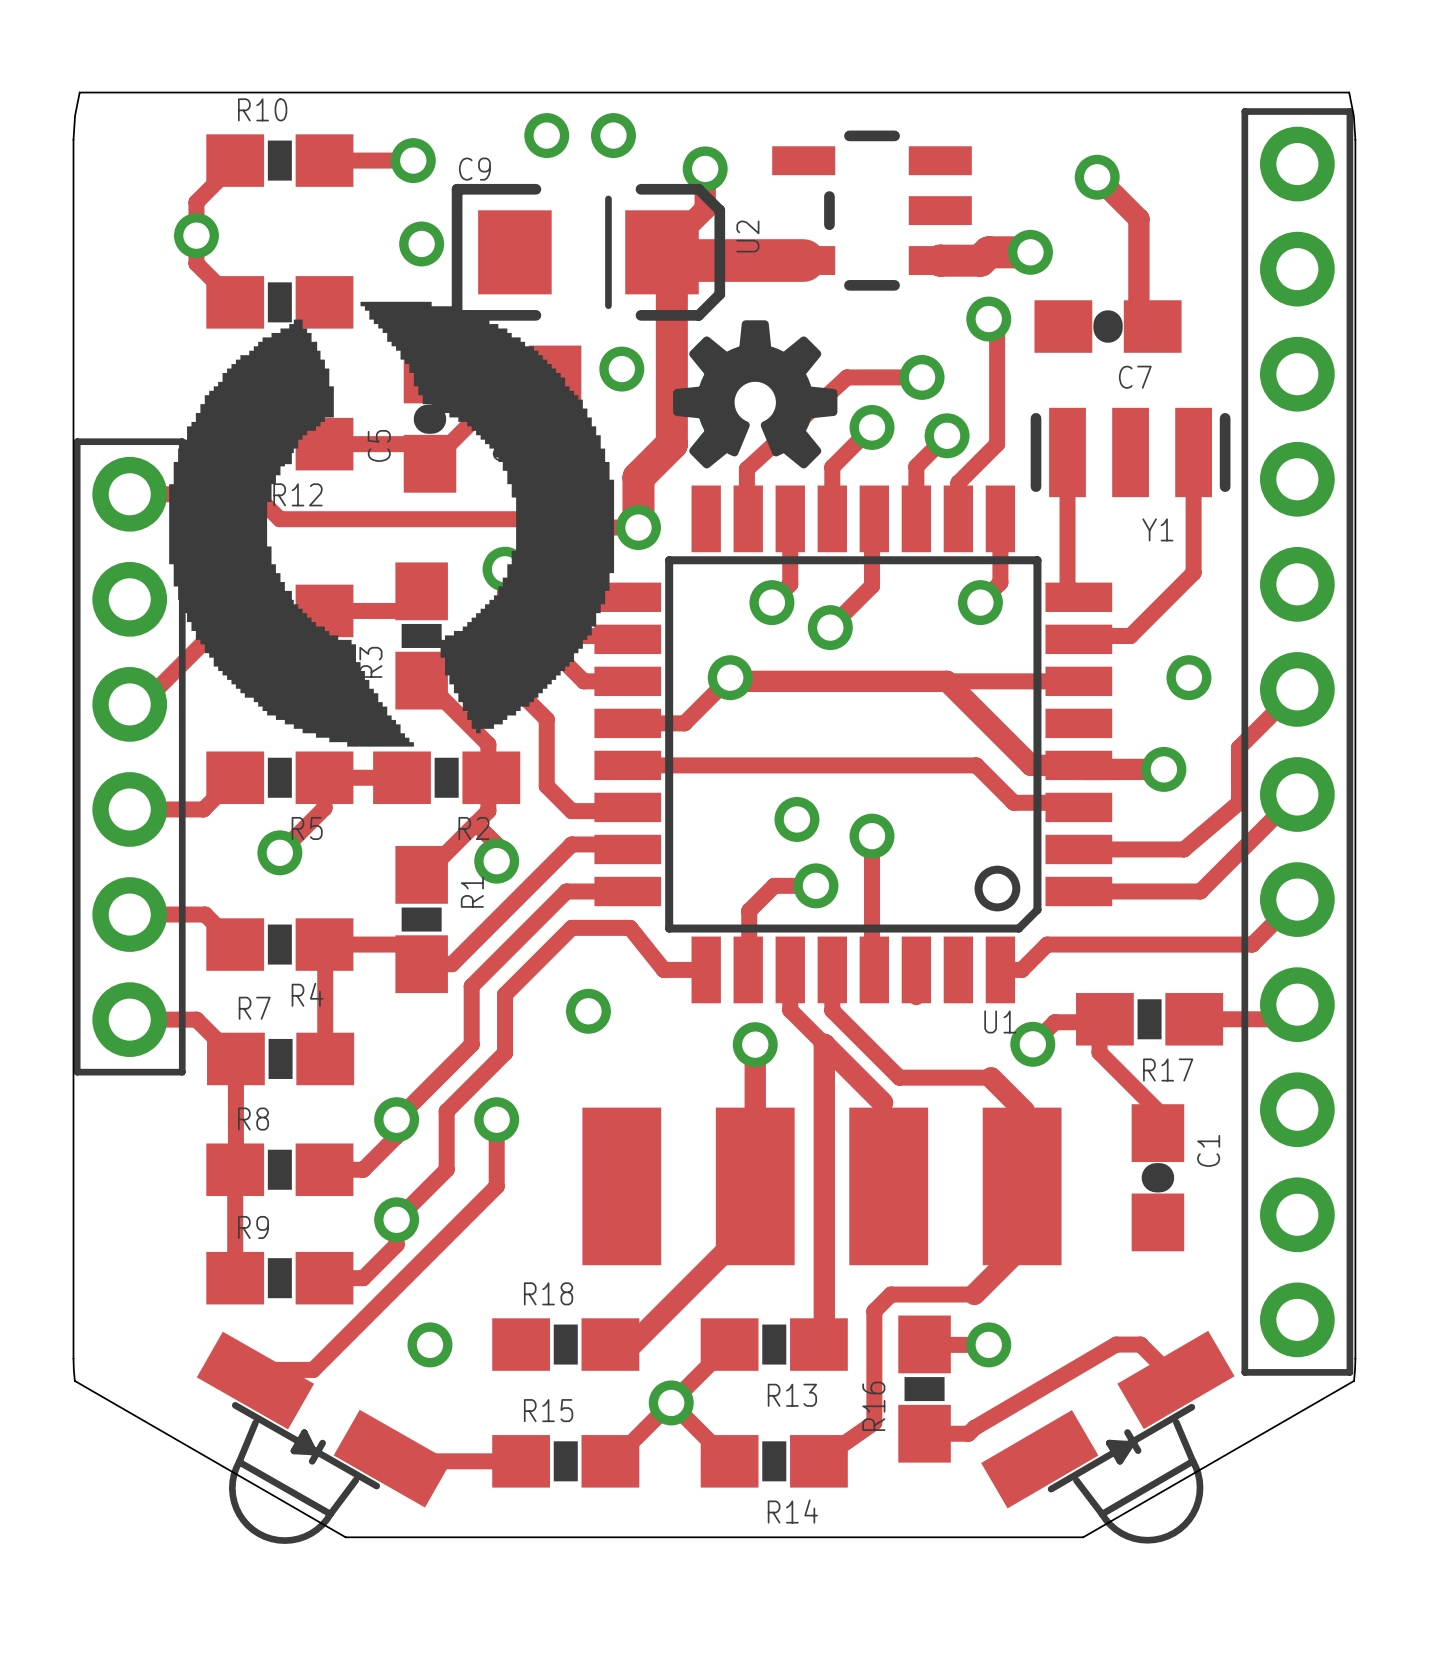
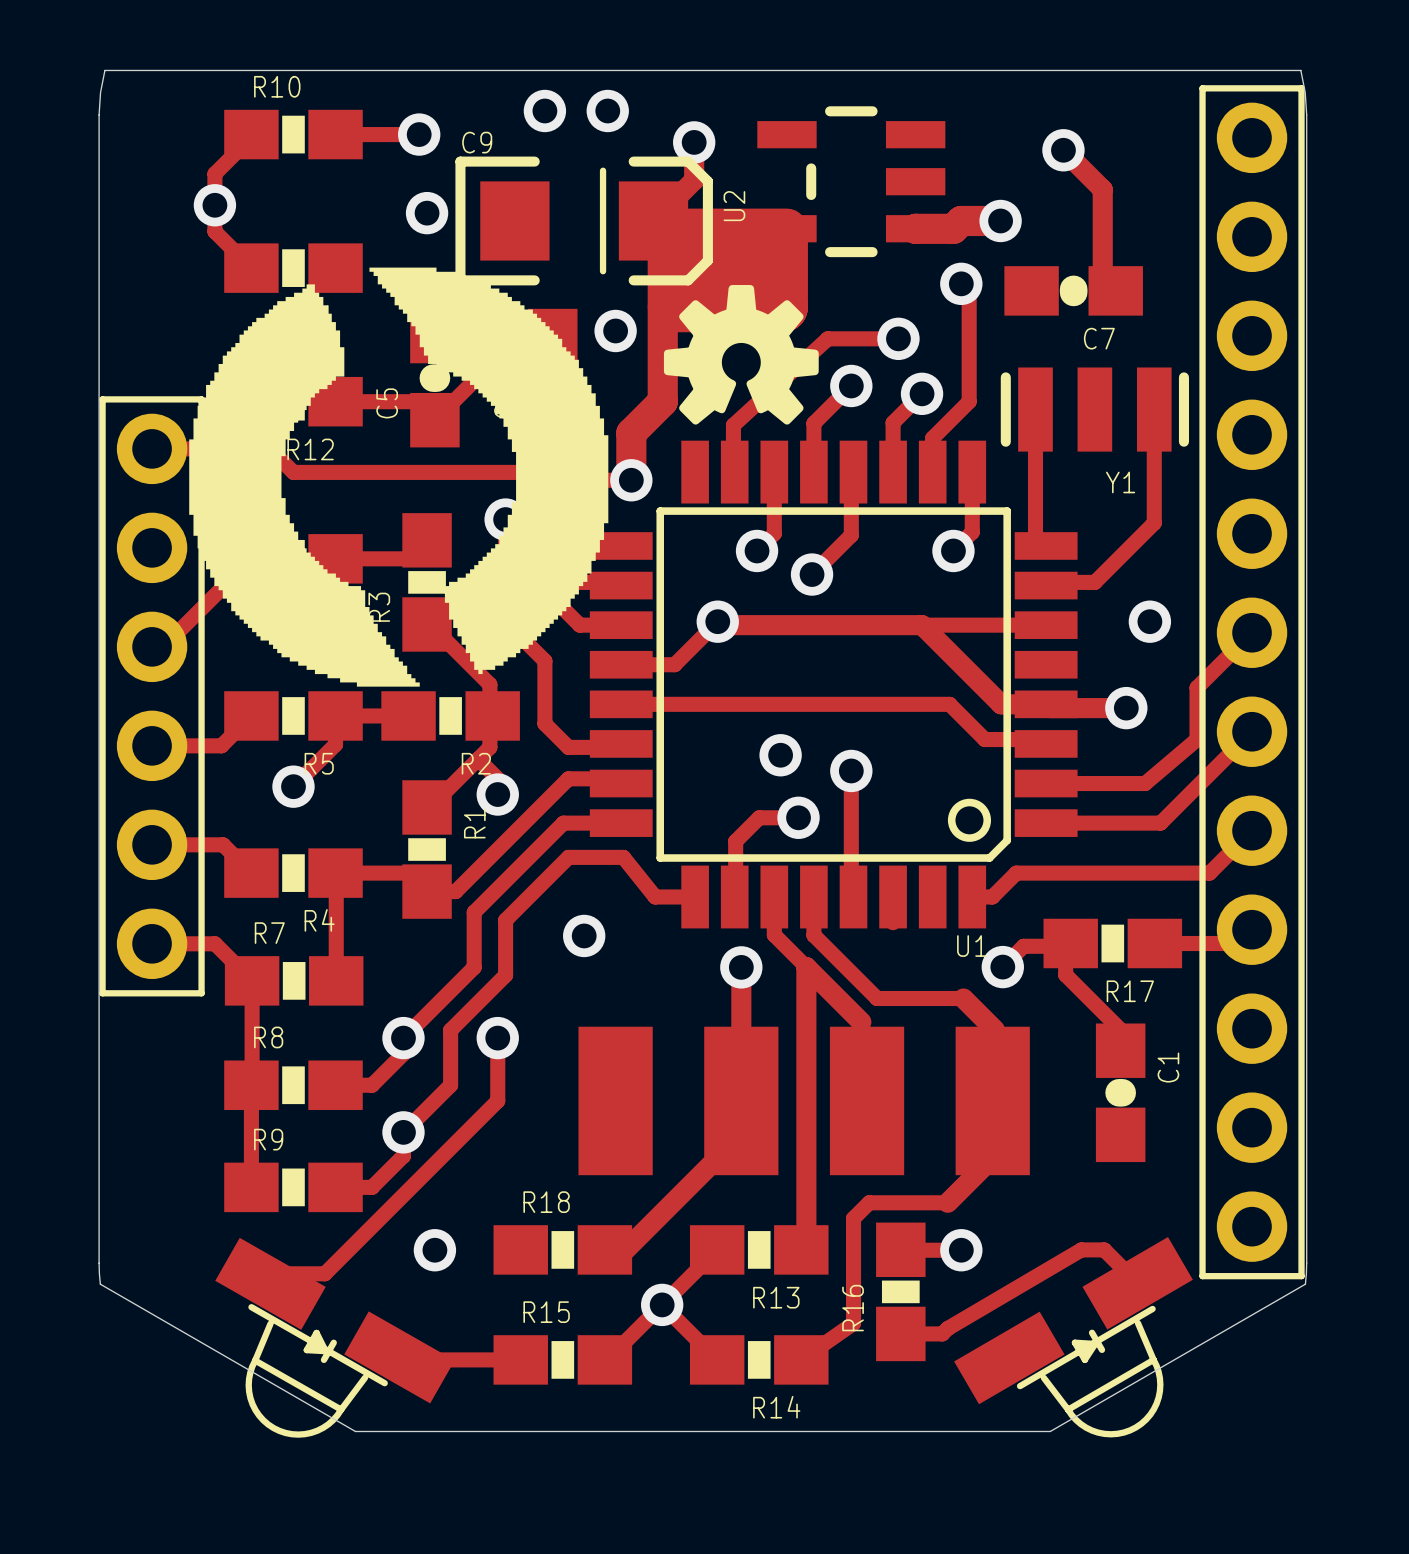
track: none -> (680, 267) (774, 267) (774, 236) (782, 236) (782, 307) (672, 307)

